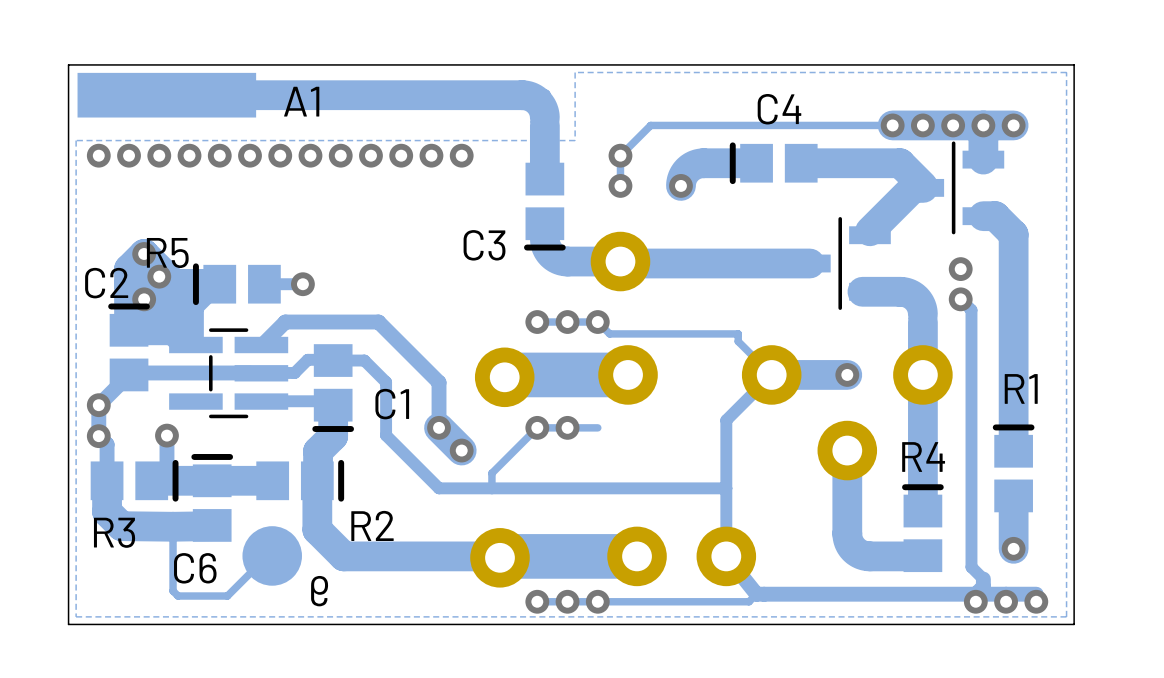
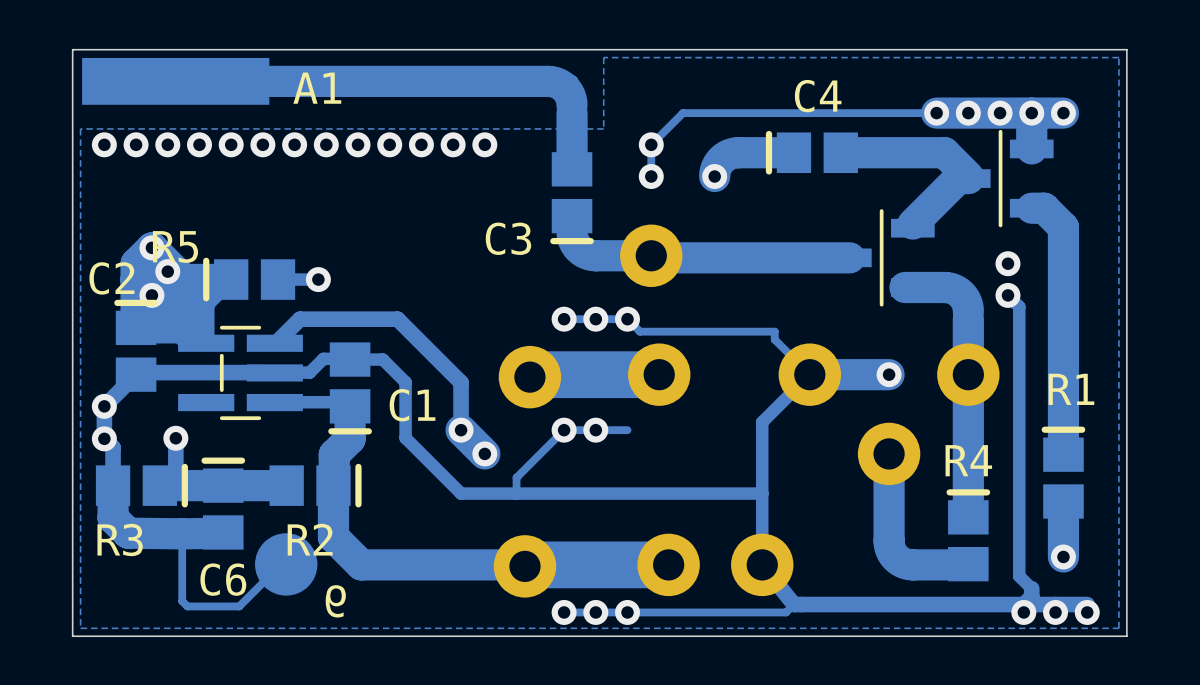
R2 name position: R2 (372, 525) -> R2 (310, 539)
C6 name position: C6 (195, 568) -> C6 (223, 579)

